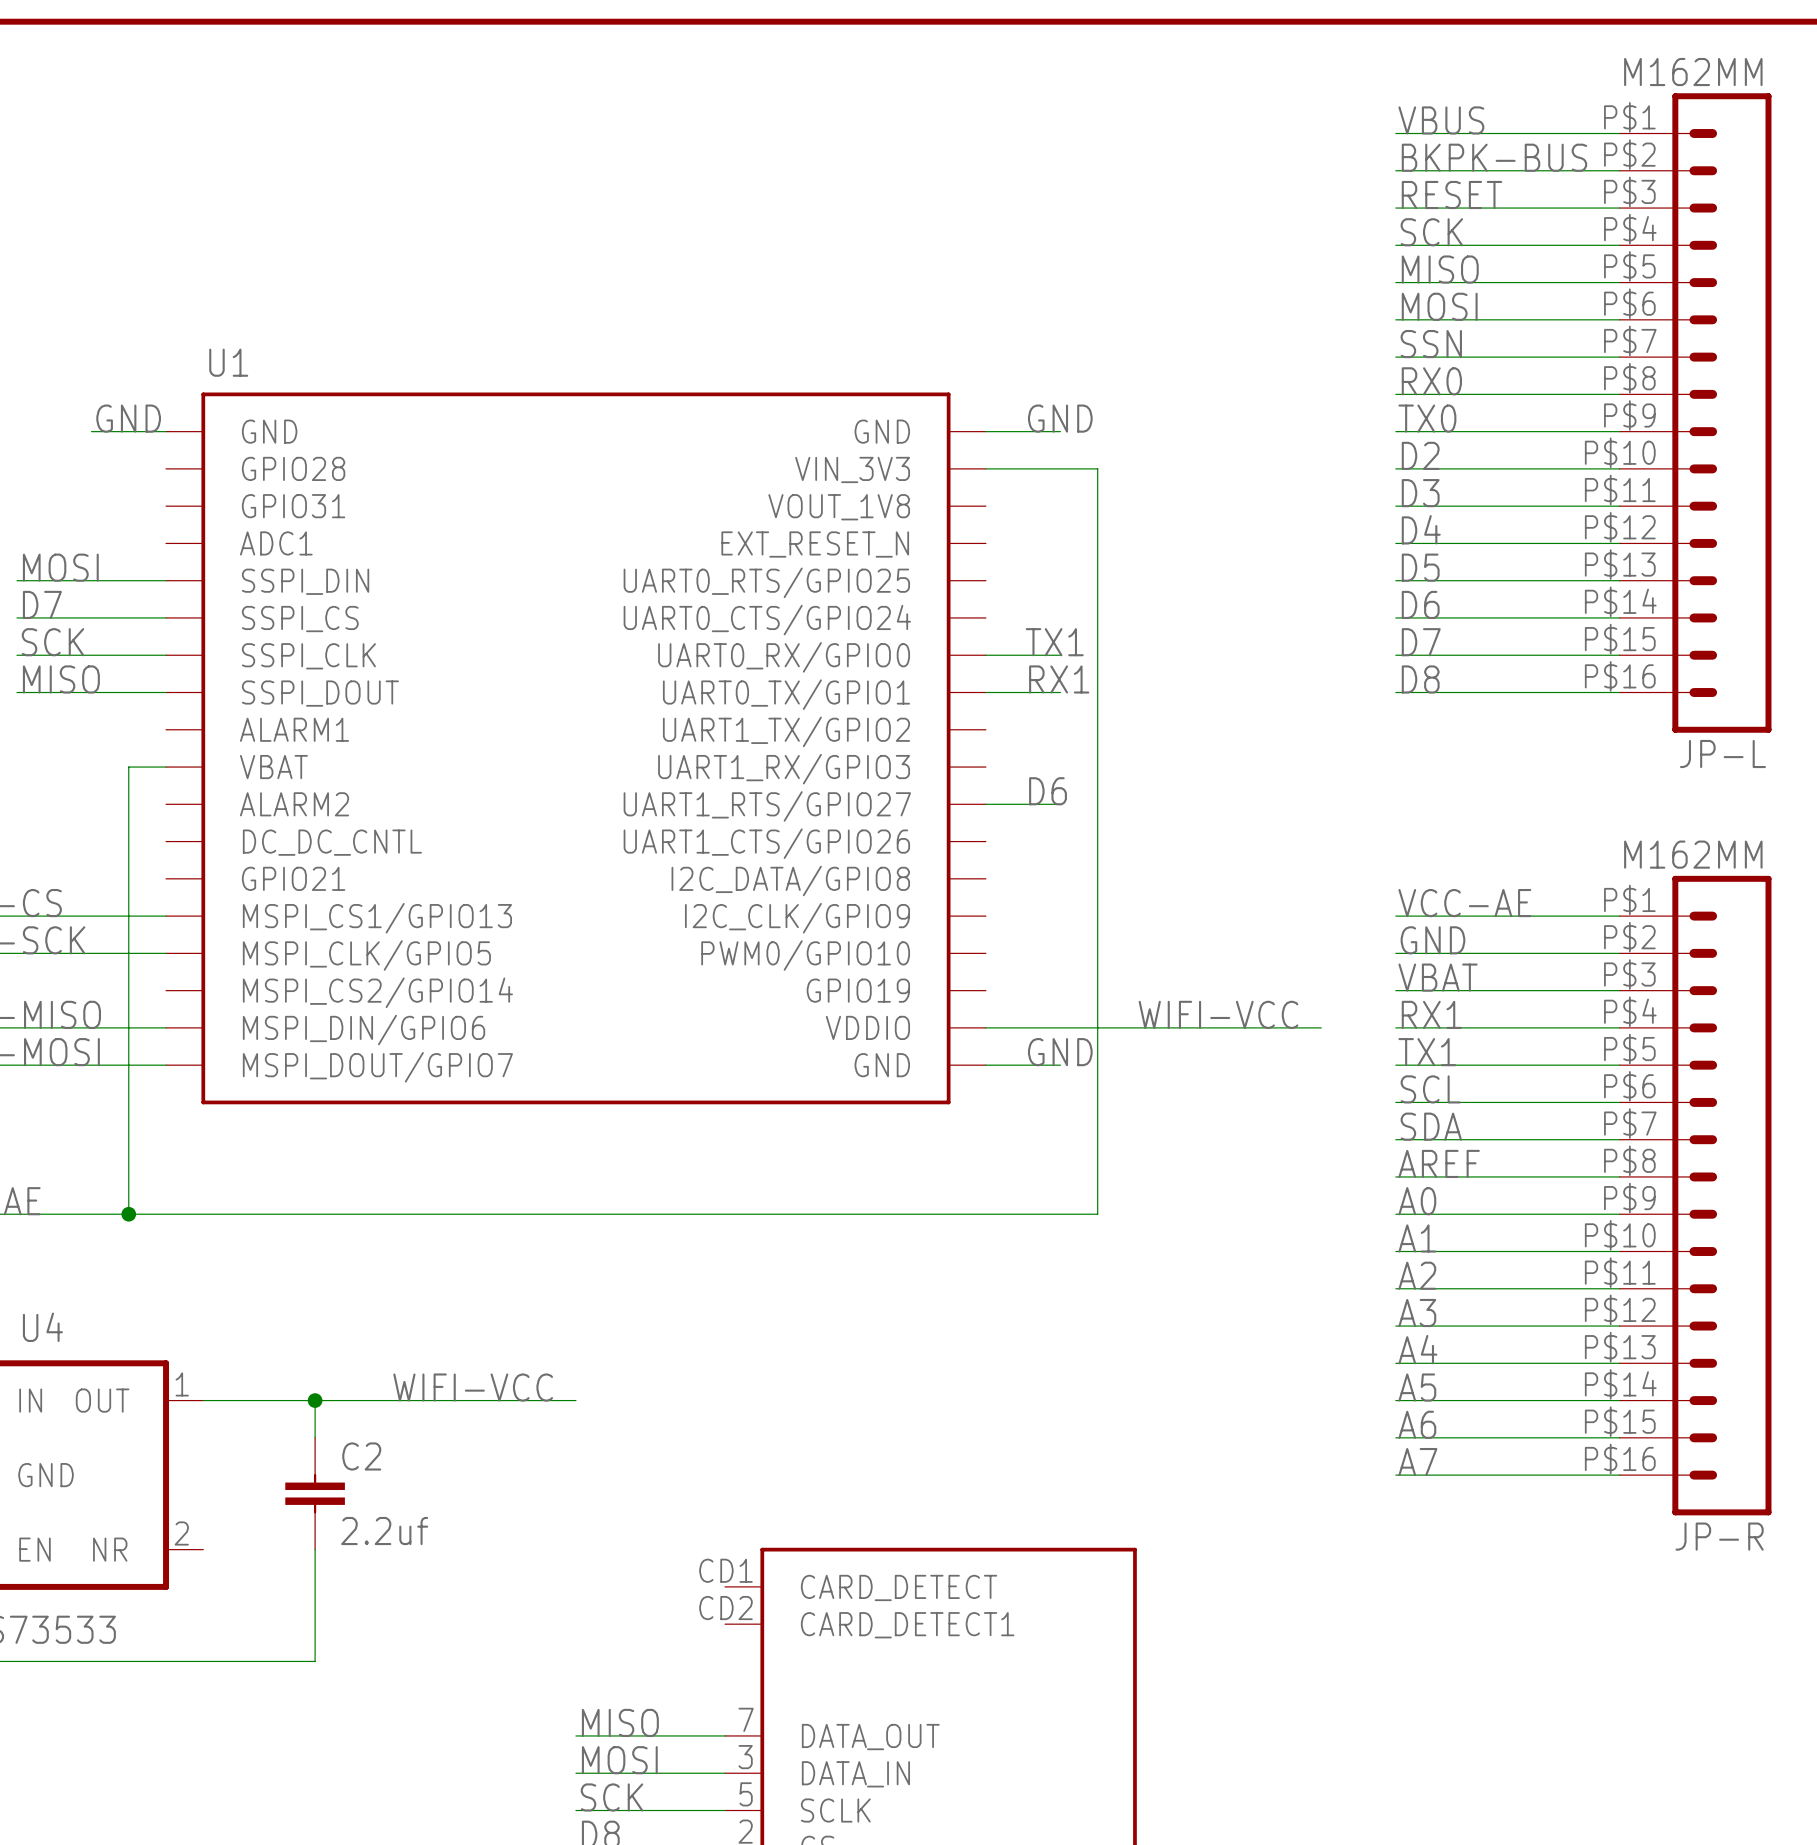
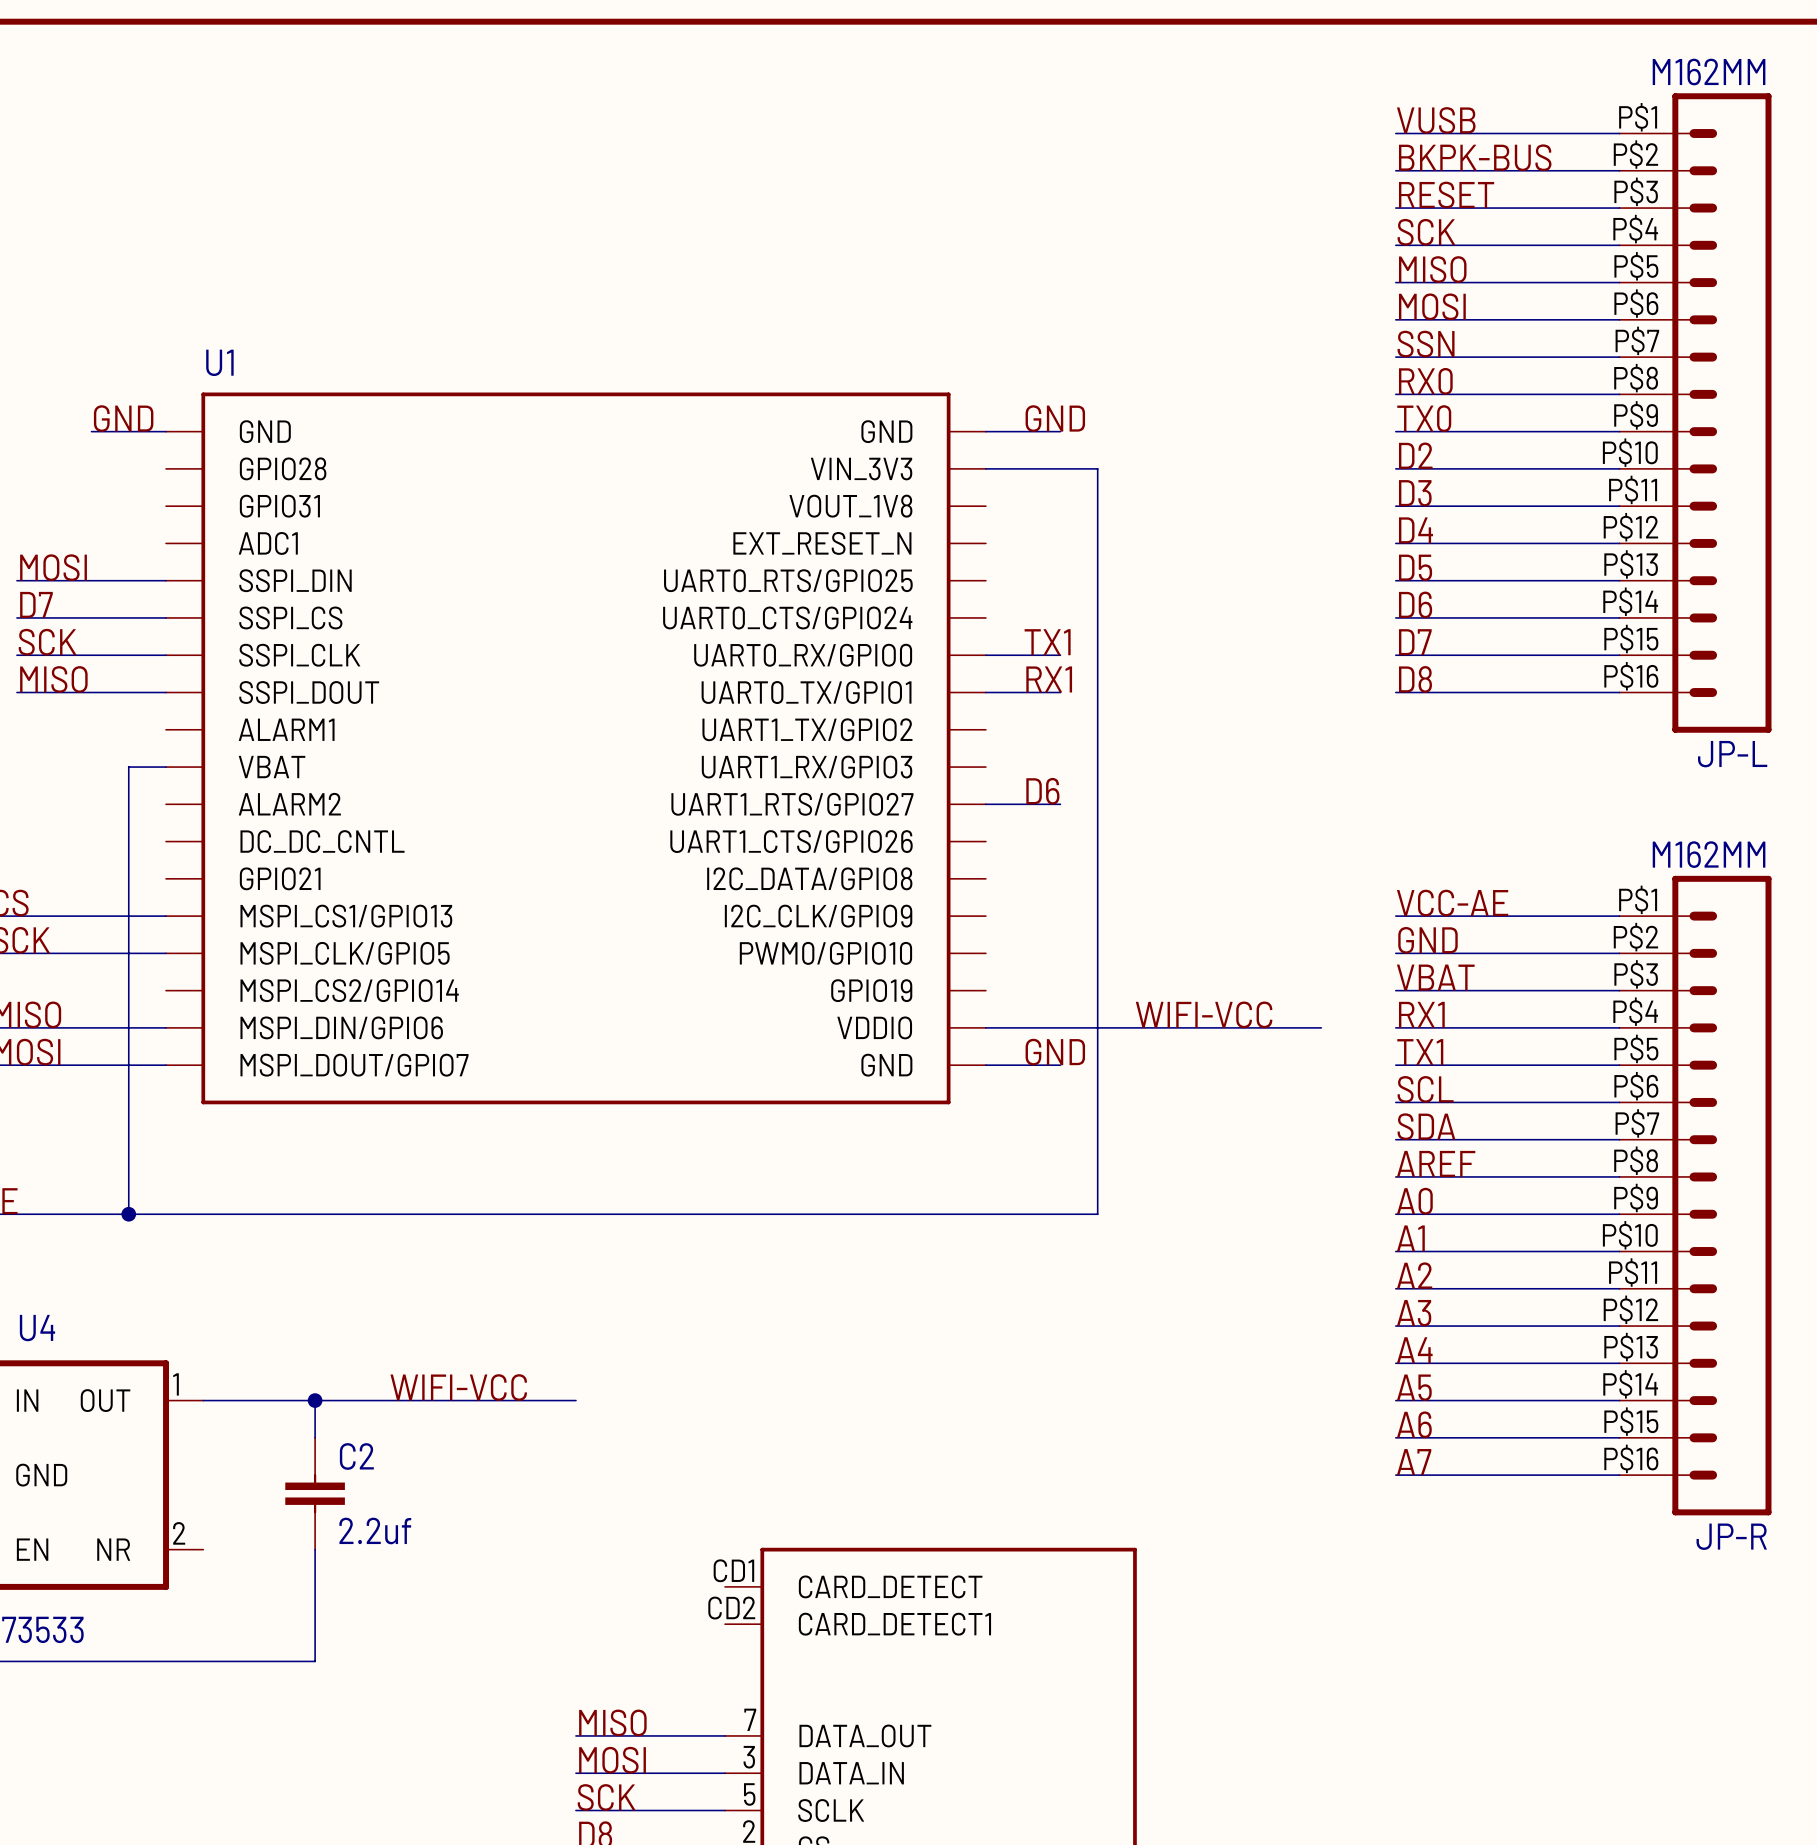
label: VBUS (1441, 120) -> VUSB (1436, 120)

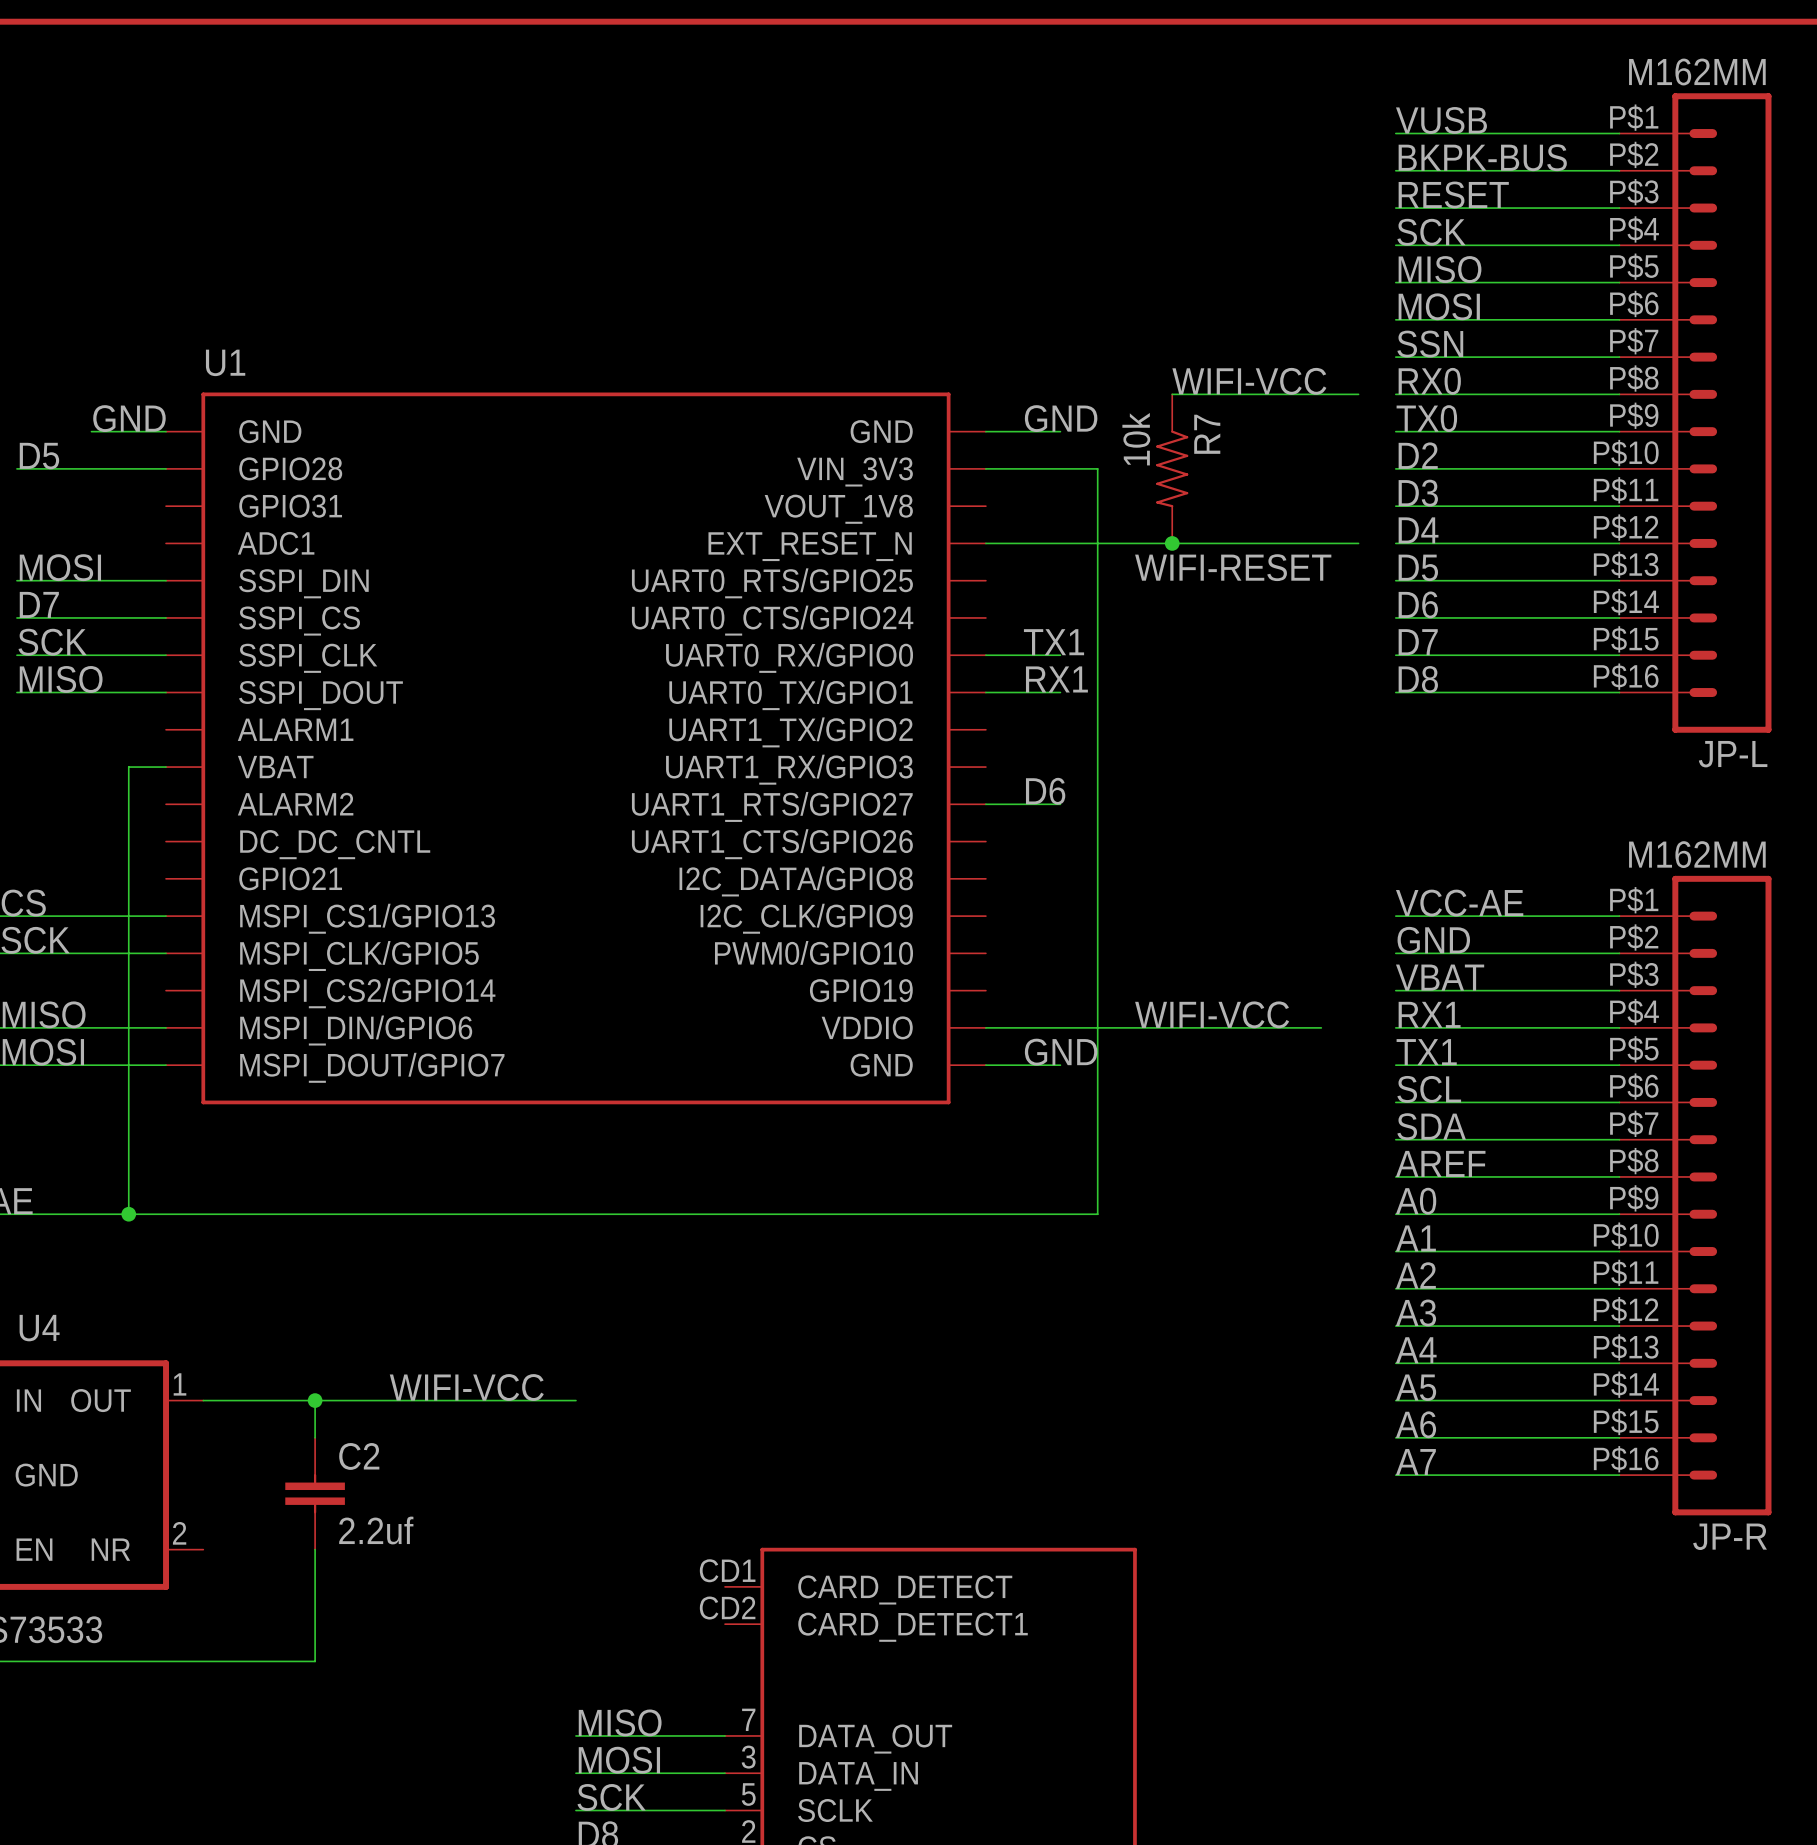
label: none -> WIFI-VCC (1249, 381)
wire: none -> (1172, 394) (1358, 394)
label: none -> D5 (39, 456)
wire: none -> (16, 468) (166, 468)
R7: none -> 10k (1172, 468)
wire: none -> (985, 543) (1358, 543)
junction: none -> (1172, 543)
label: none -> WIFI-RESET (1233, 567)

